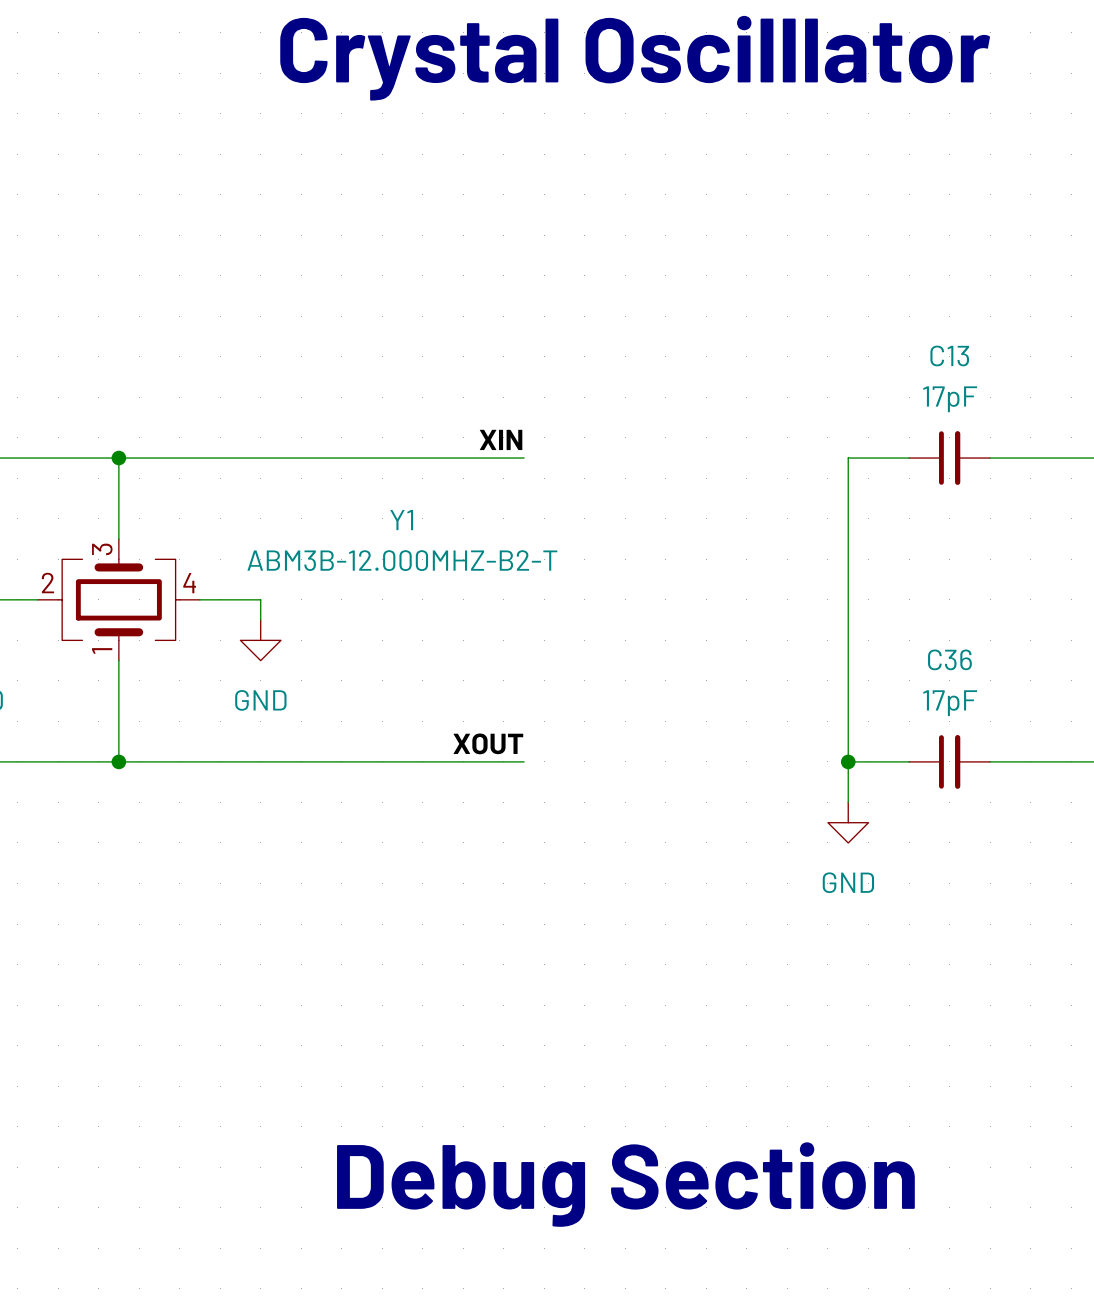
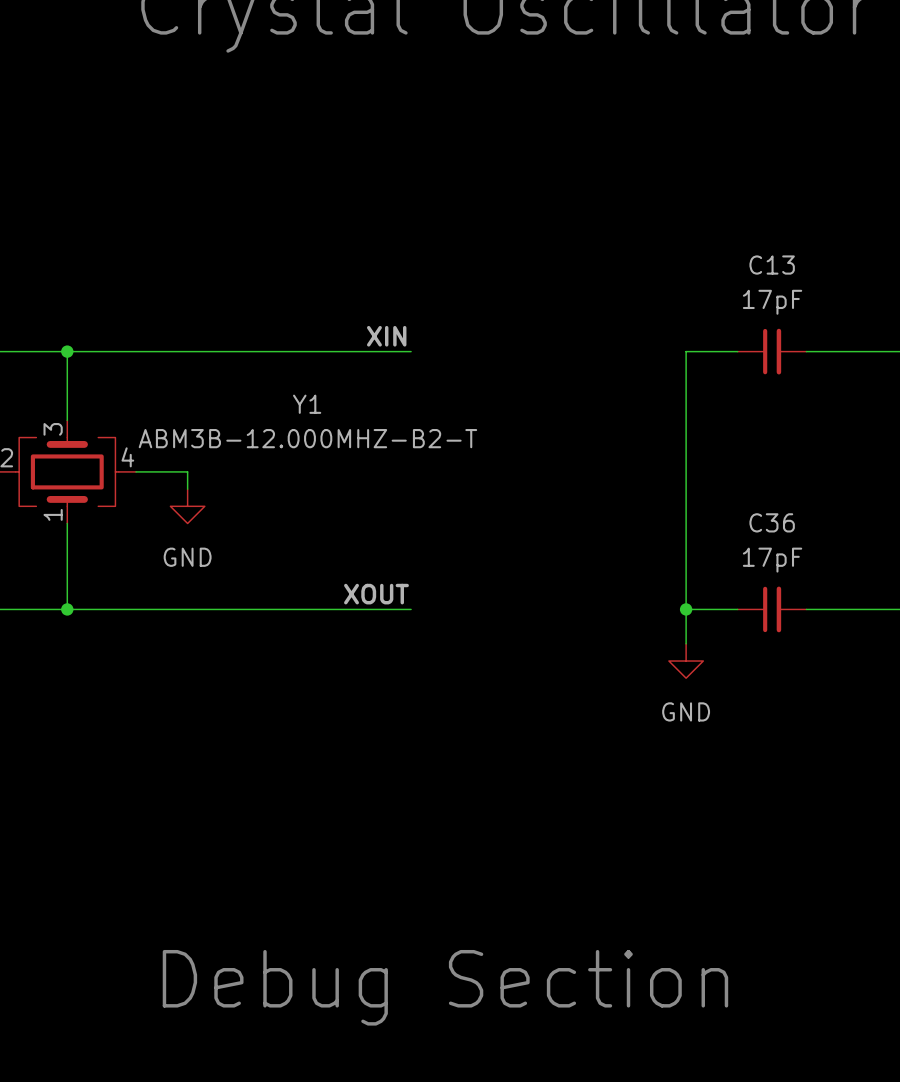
text position: Debug Section (625, 1184) -> Debug Section (445, 987)

